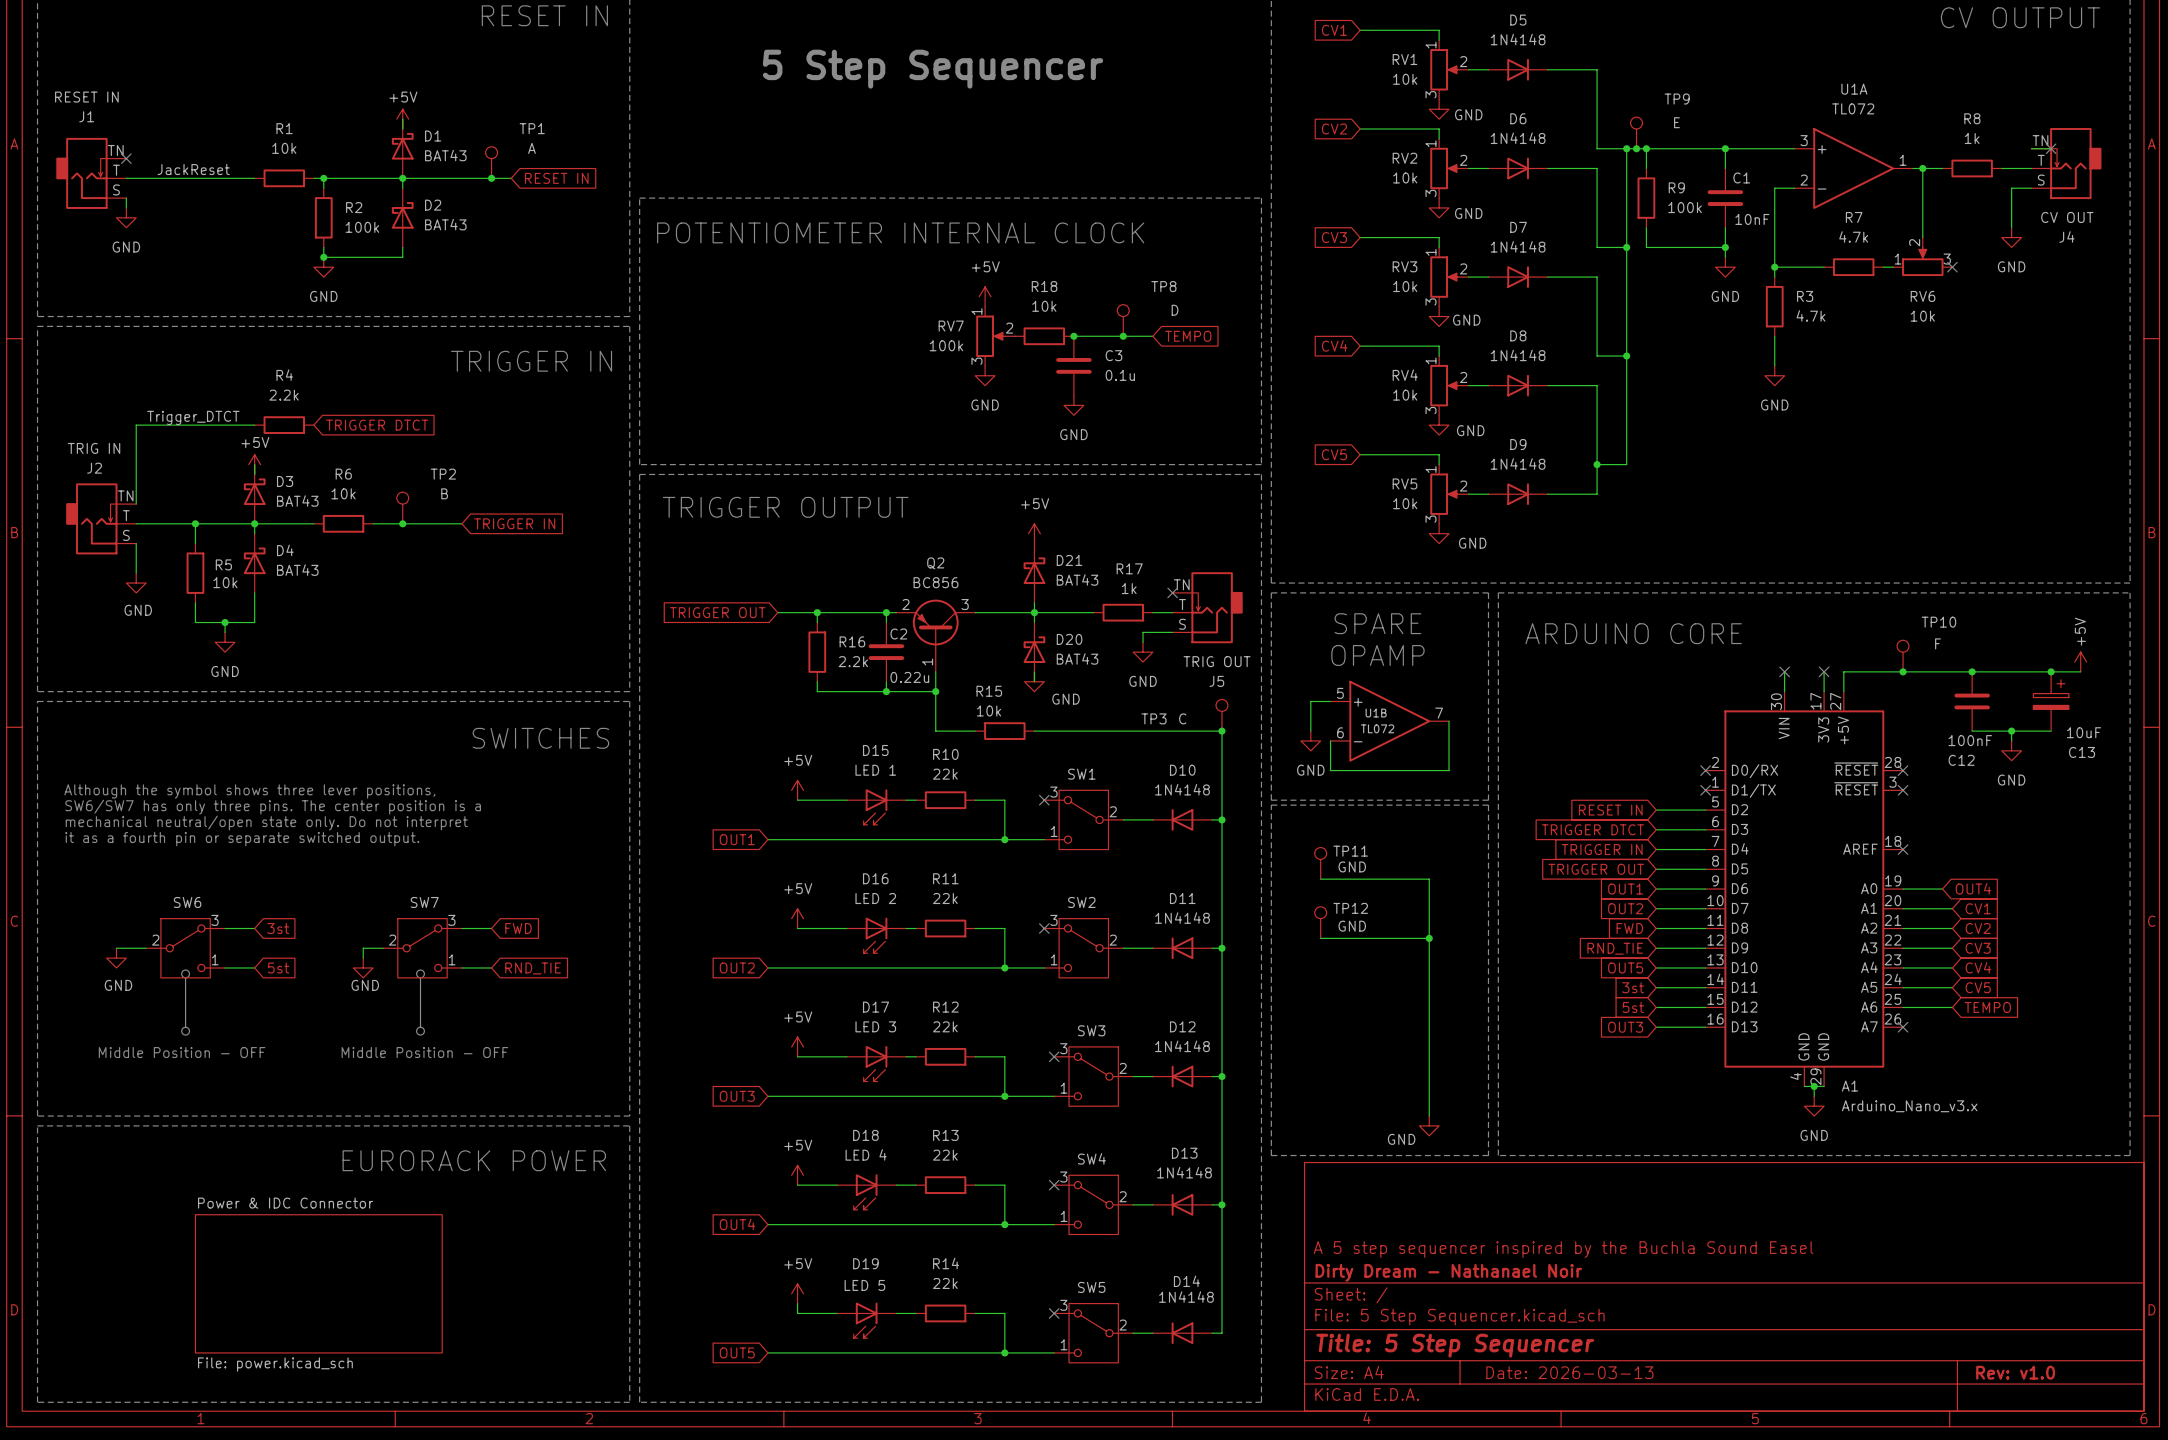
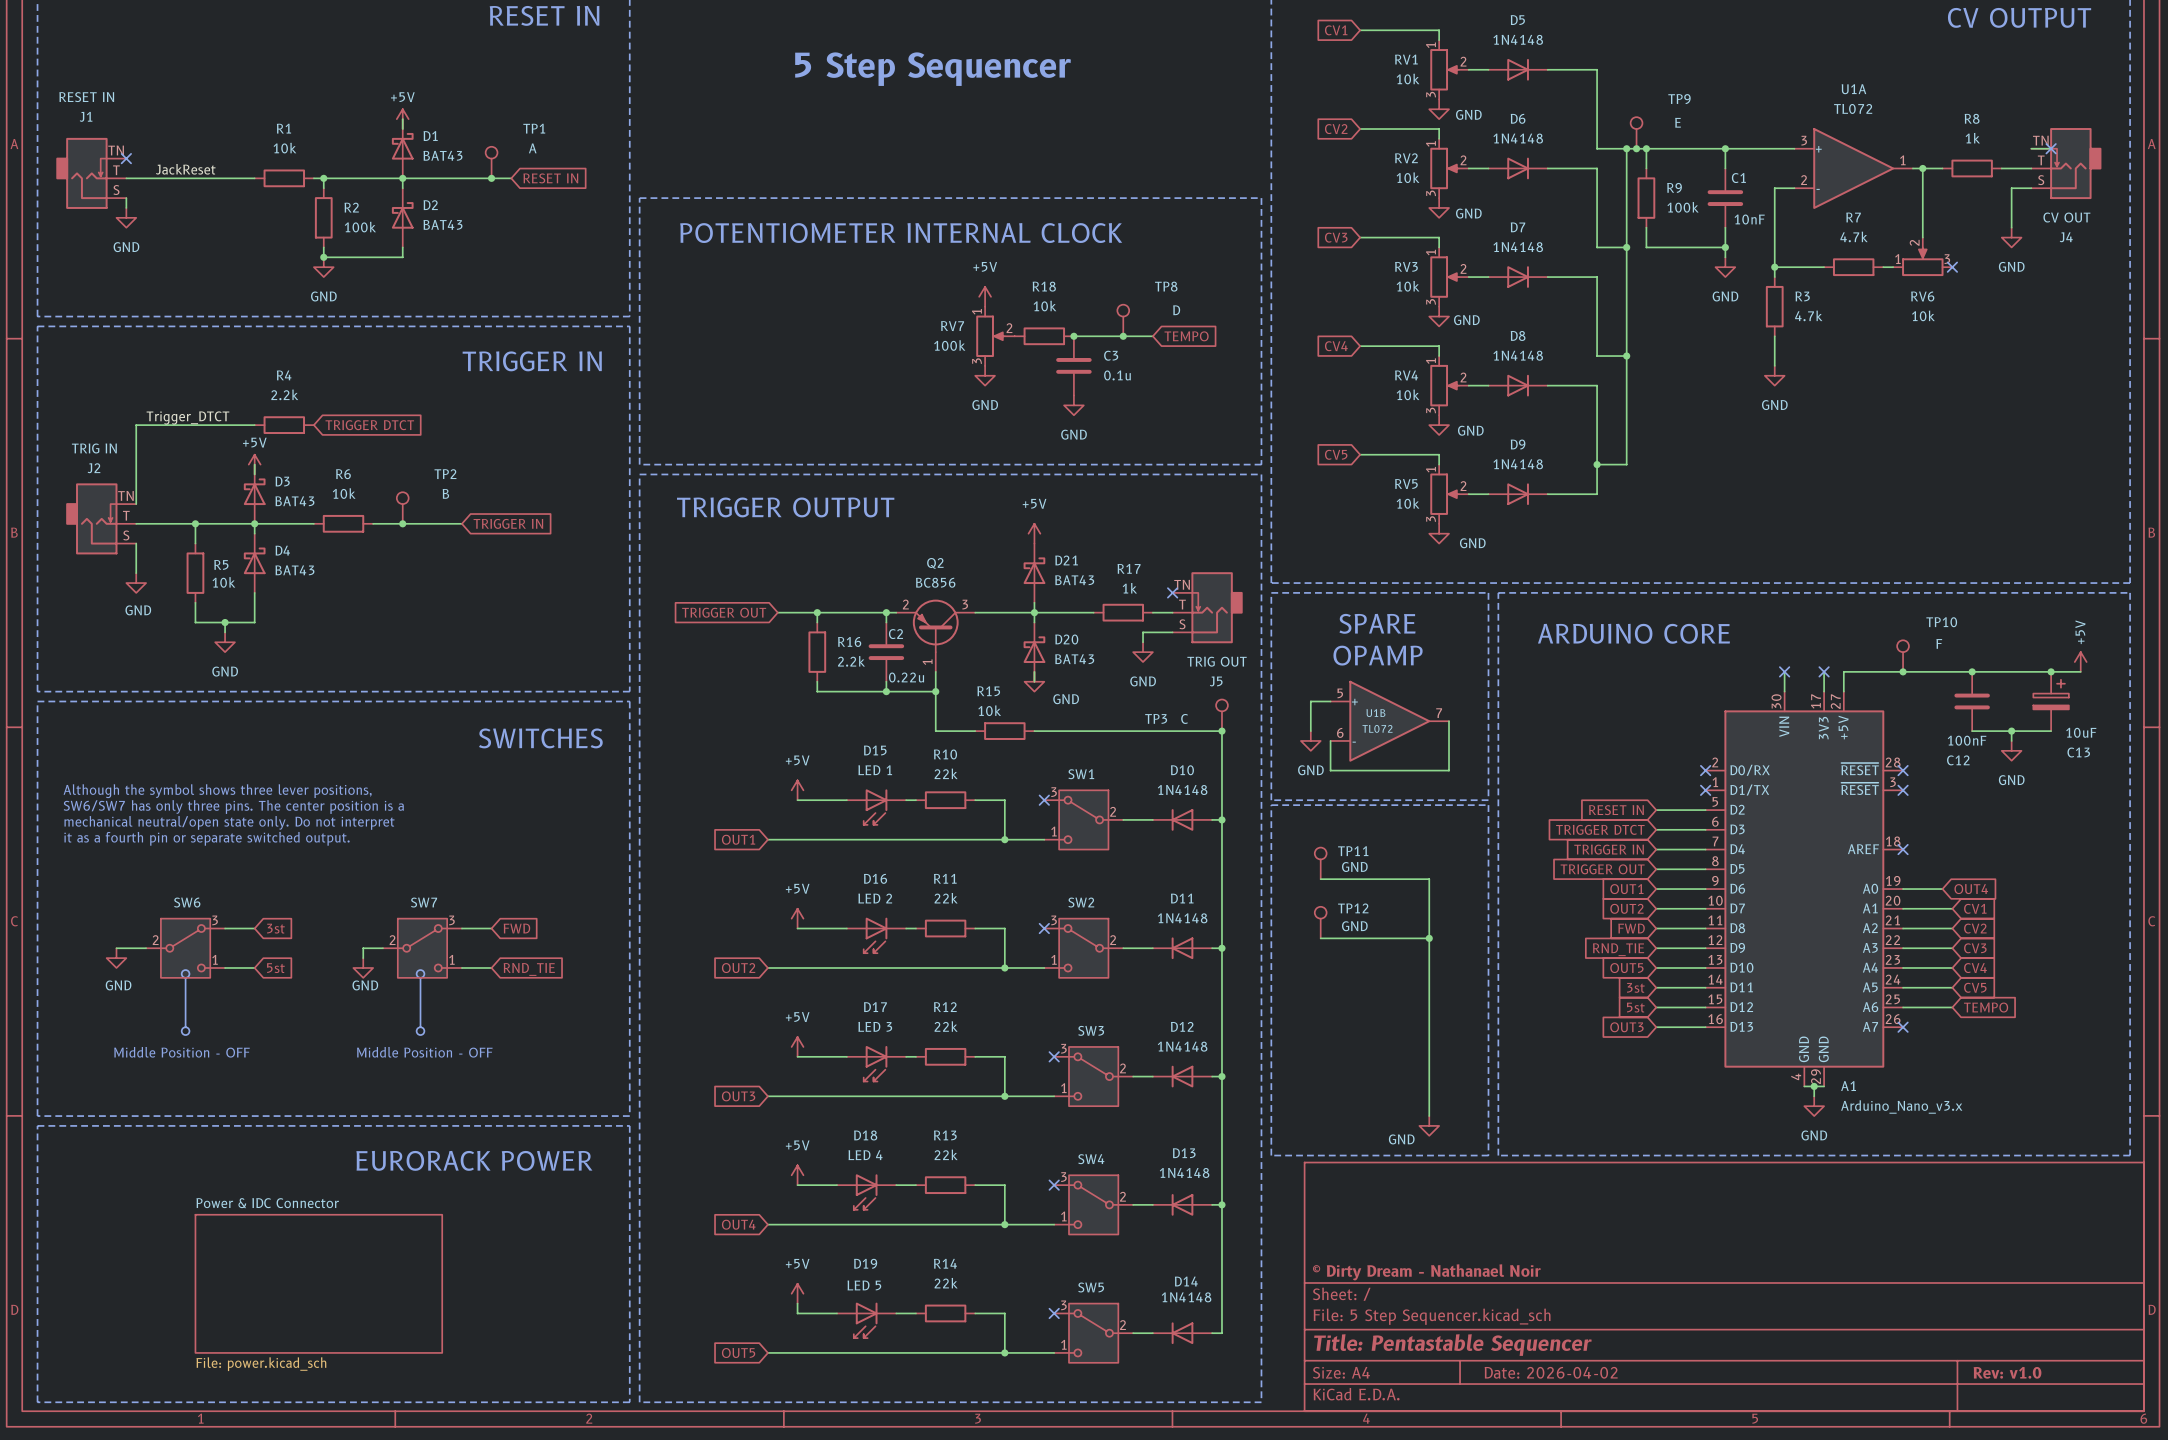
title block: A 5 step sequencer inspired by the Buchla Sound Easel (1563, 1249) -> none
title block: Dirty Dream - Nathanael Noir (1448, 1272) -> © Dirty Dream - Nathanael Noir (1426, 1272)
title block: Title: 5 Step Sequencer (1455, 1345) -> Title: Pentastable Sequencer (1452, 1345)
title block: Date: 2026-03-13 (1569, 1372) -> Date: 2026-04-02 (1551, 1372)

